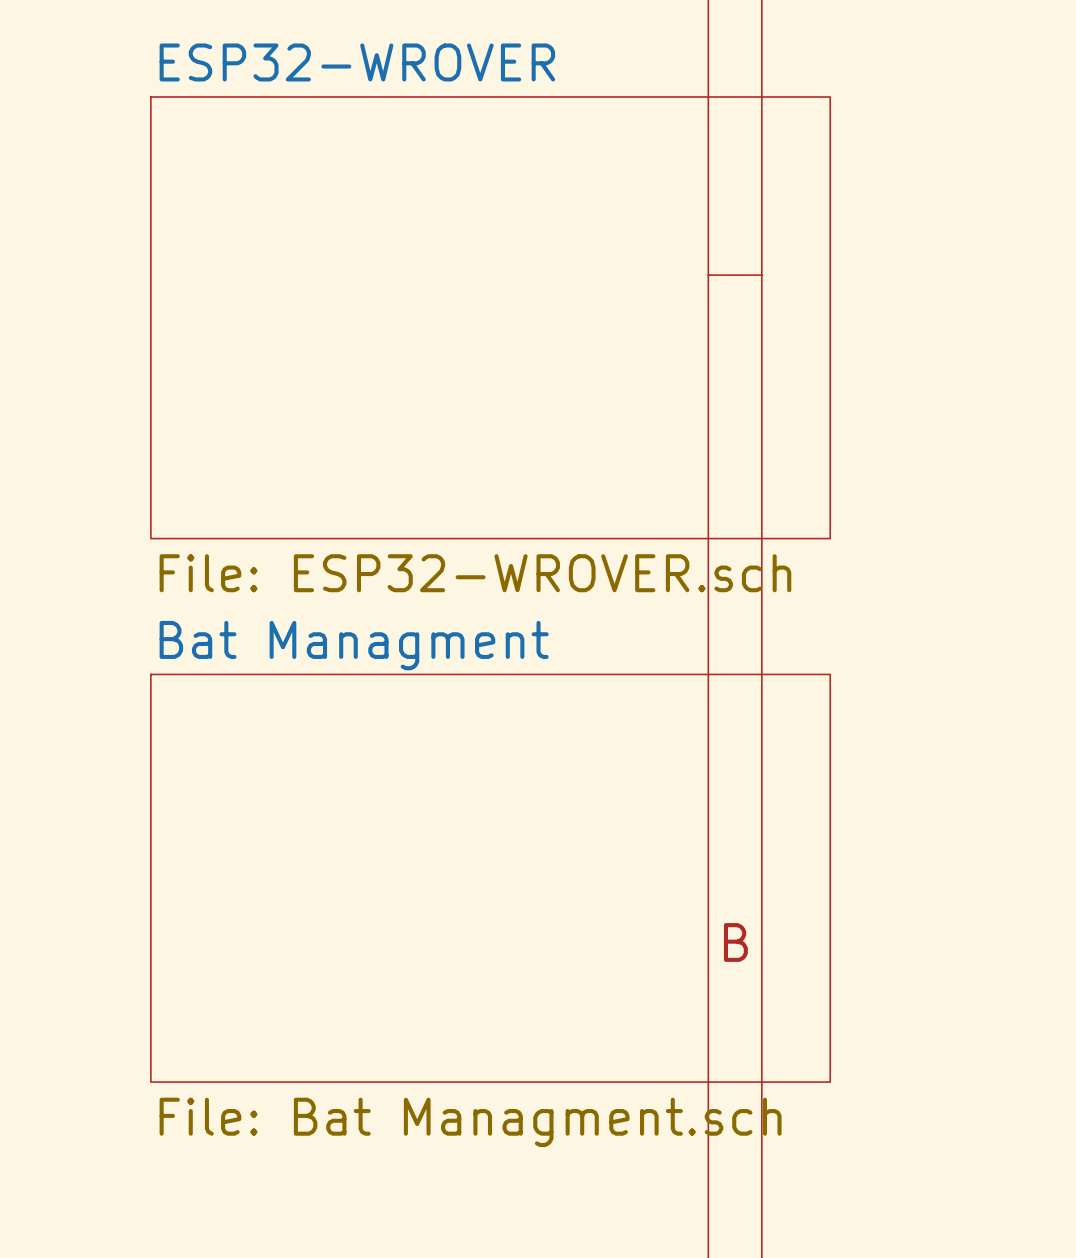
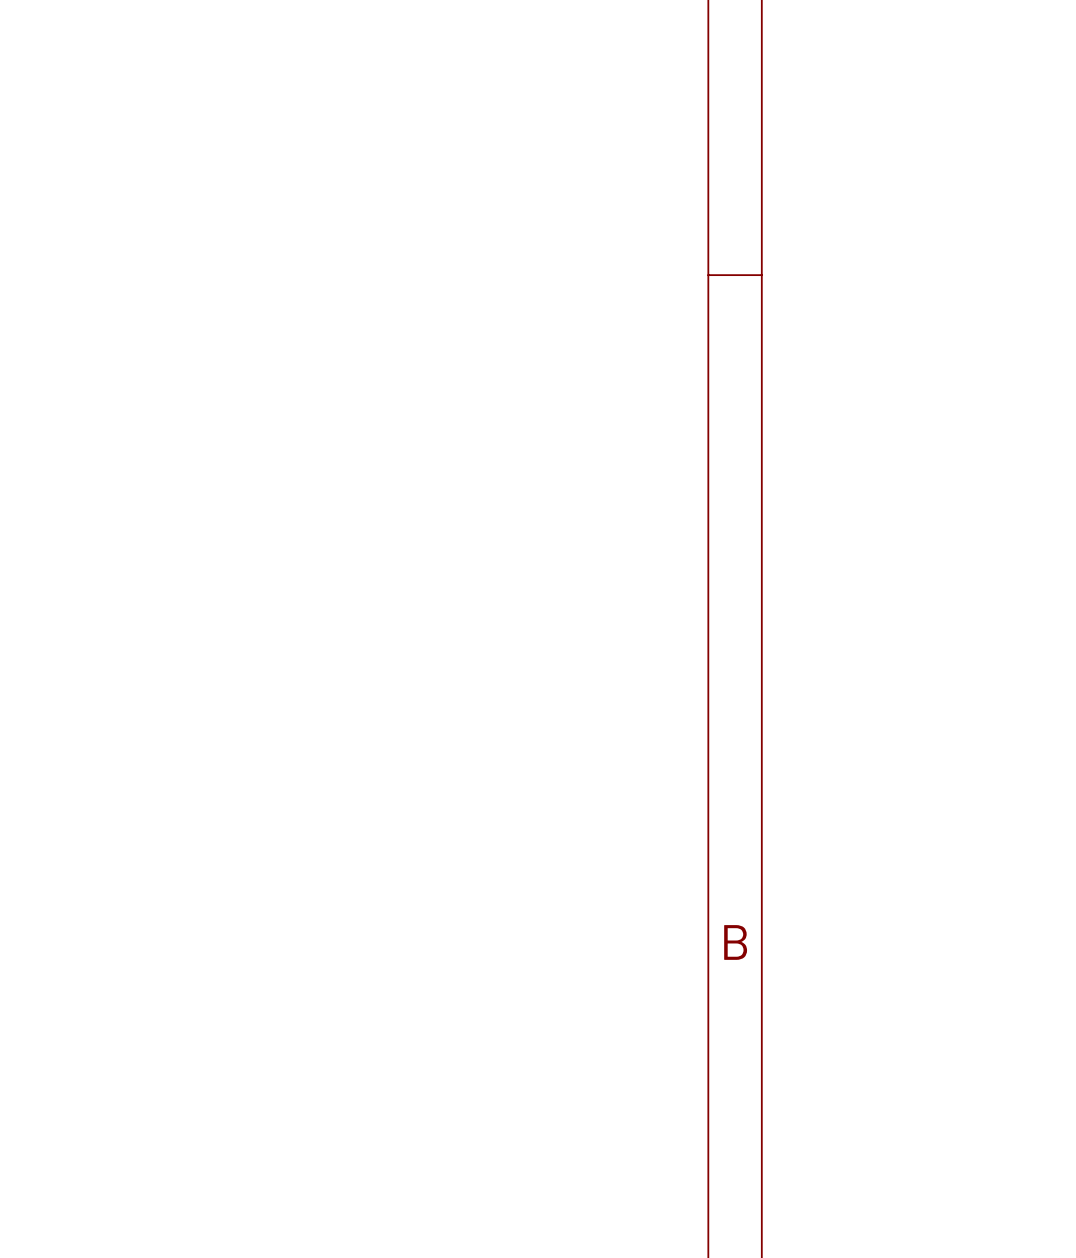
sheet ESP32-WROVER: File: ESP32-WROVER.sch (490, 317) -> none
sheet Bat Managment: File: Bat Managment.sch (490, 878) -> none

